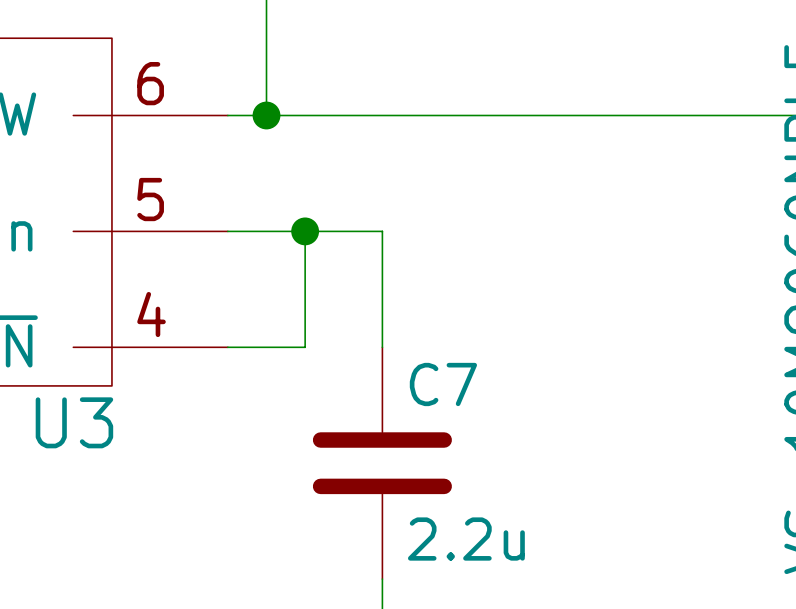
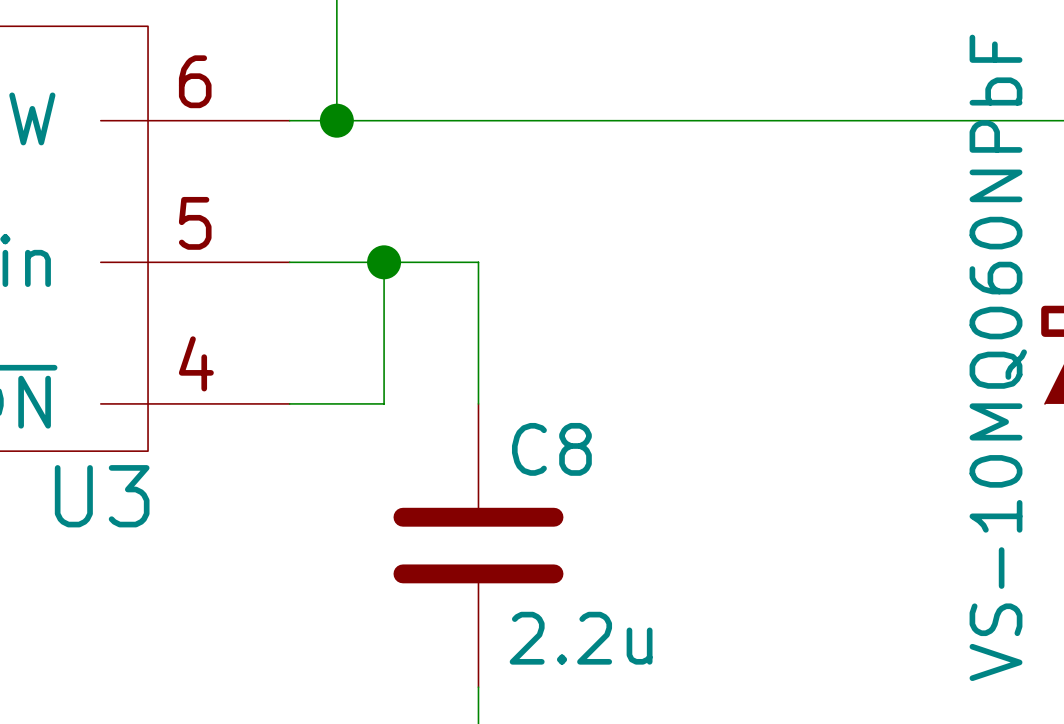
C7 name: C7 (443, 384) -> C8 (551, 449)

